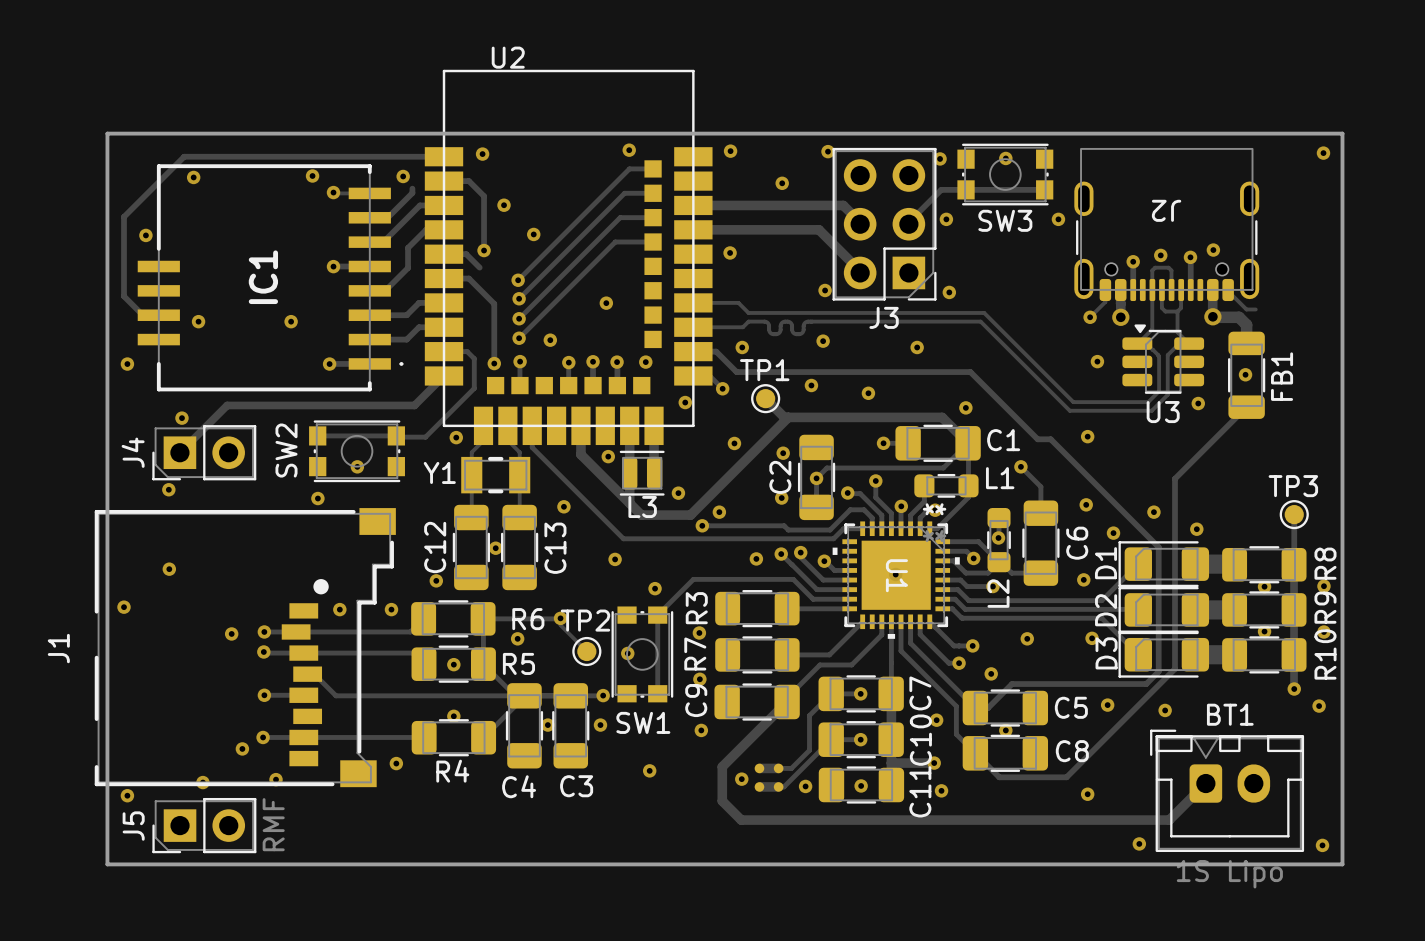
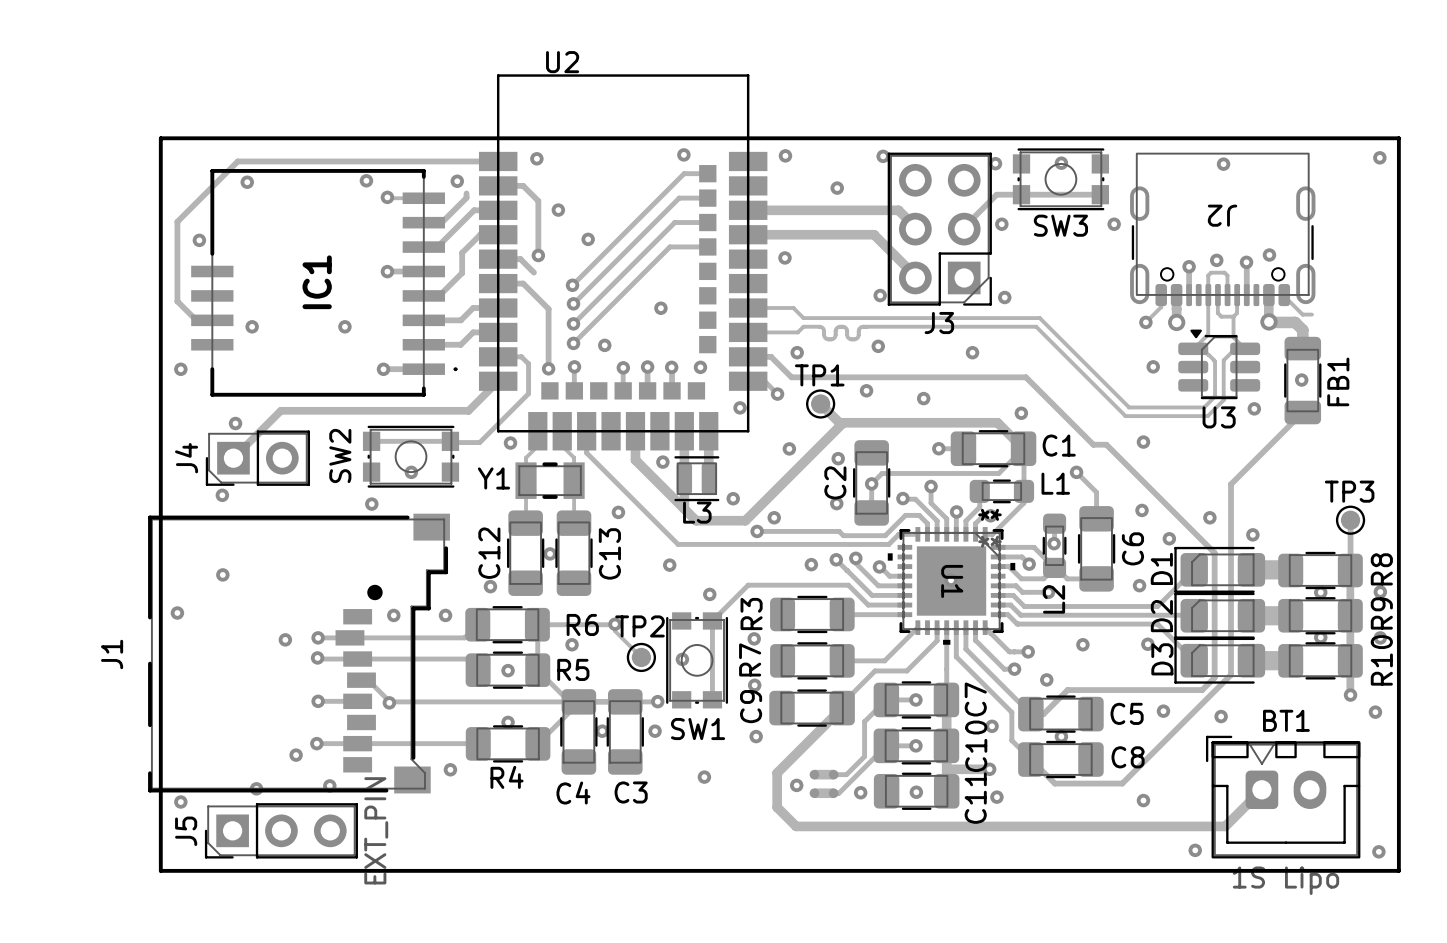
via: none -> (1223, 164)
via: none -> (389, 702)
J5 footprint: [152, 797, 257, 854] -> [204, 803, 358, 859]
J5 value: RMF (273, 824) -> EXT_PIN (376, 830)

